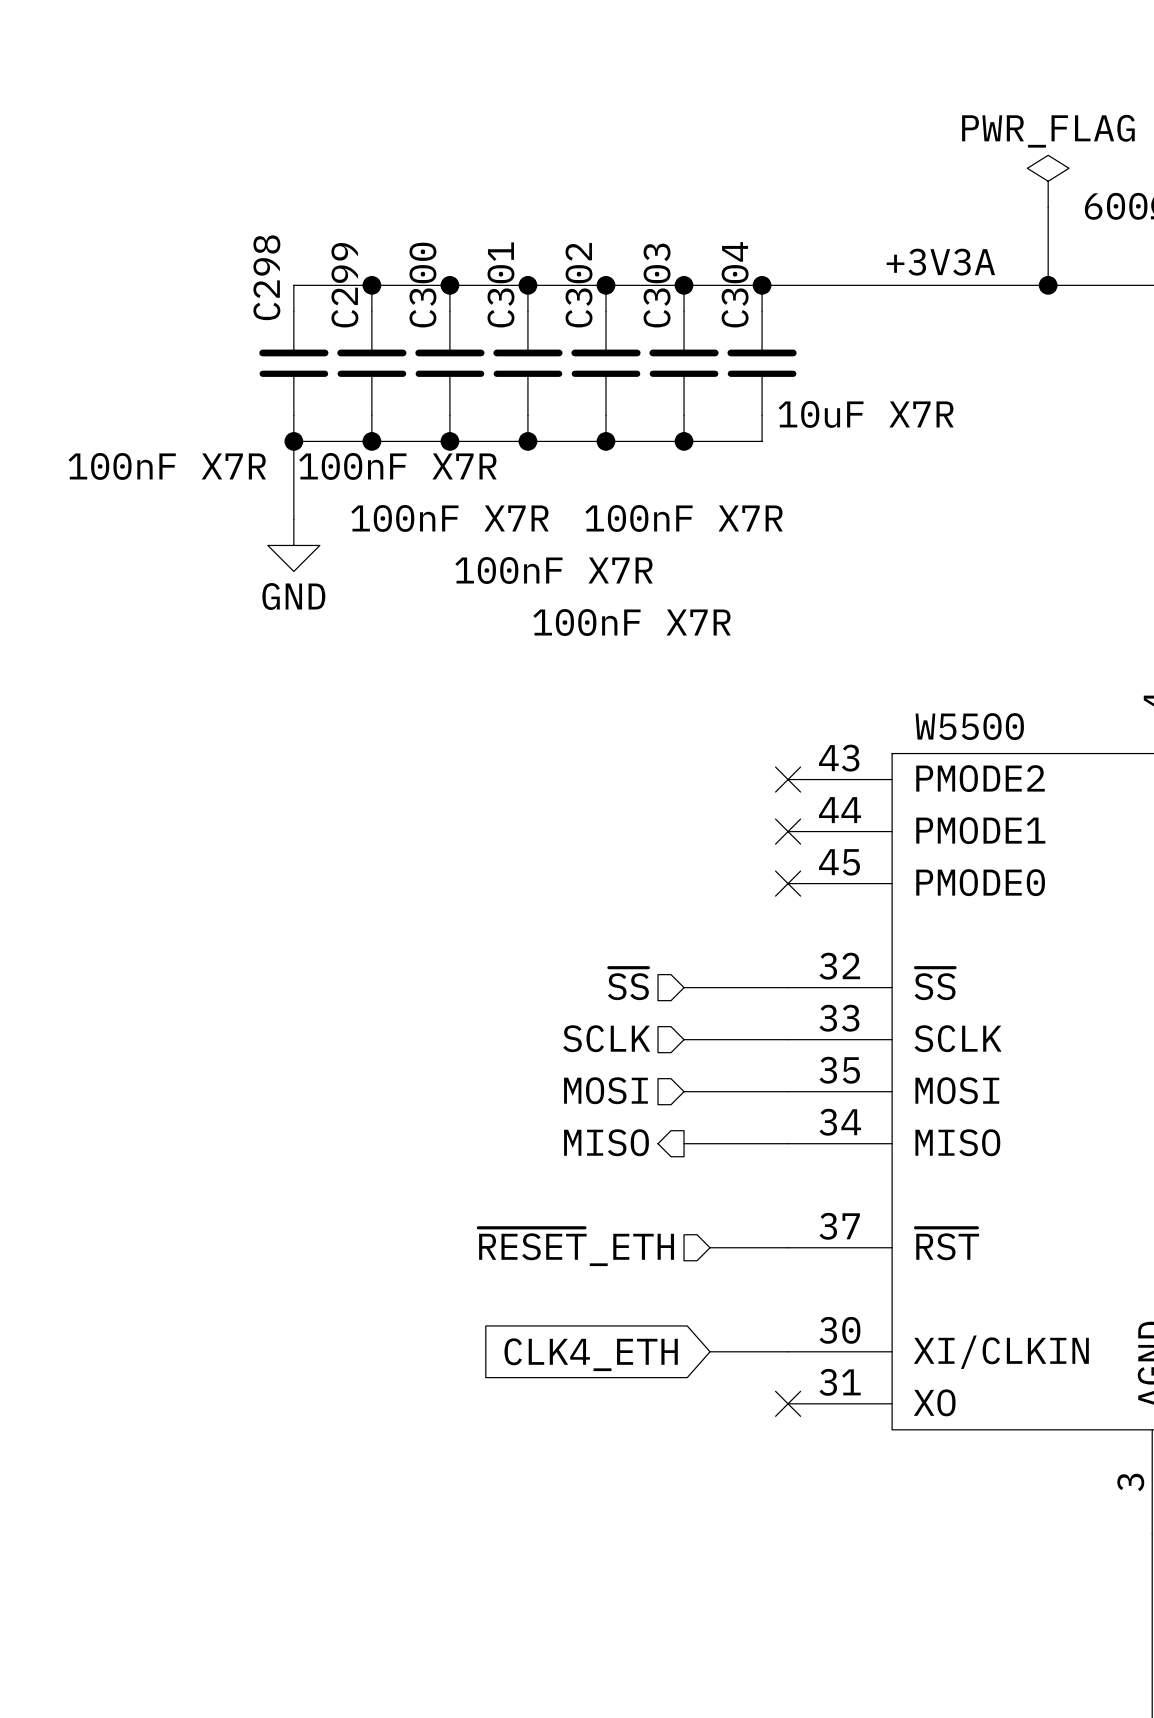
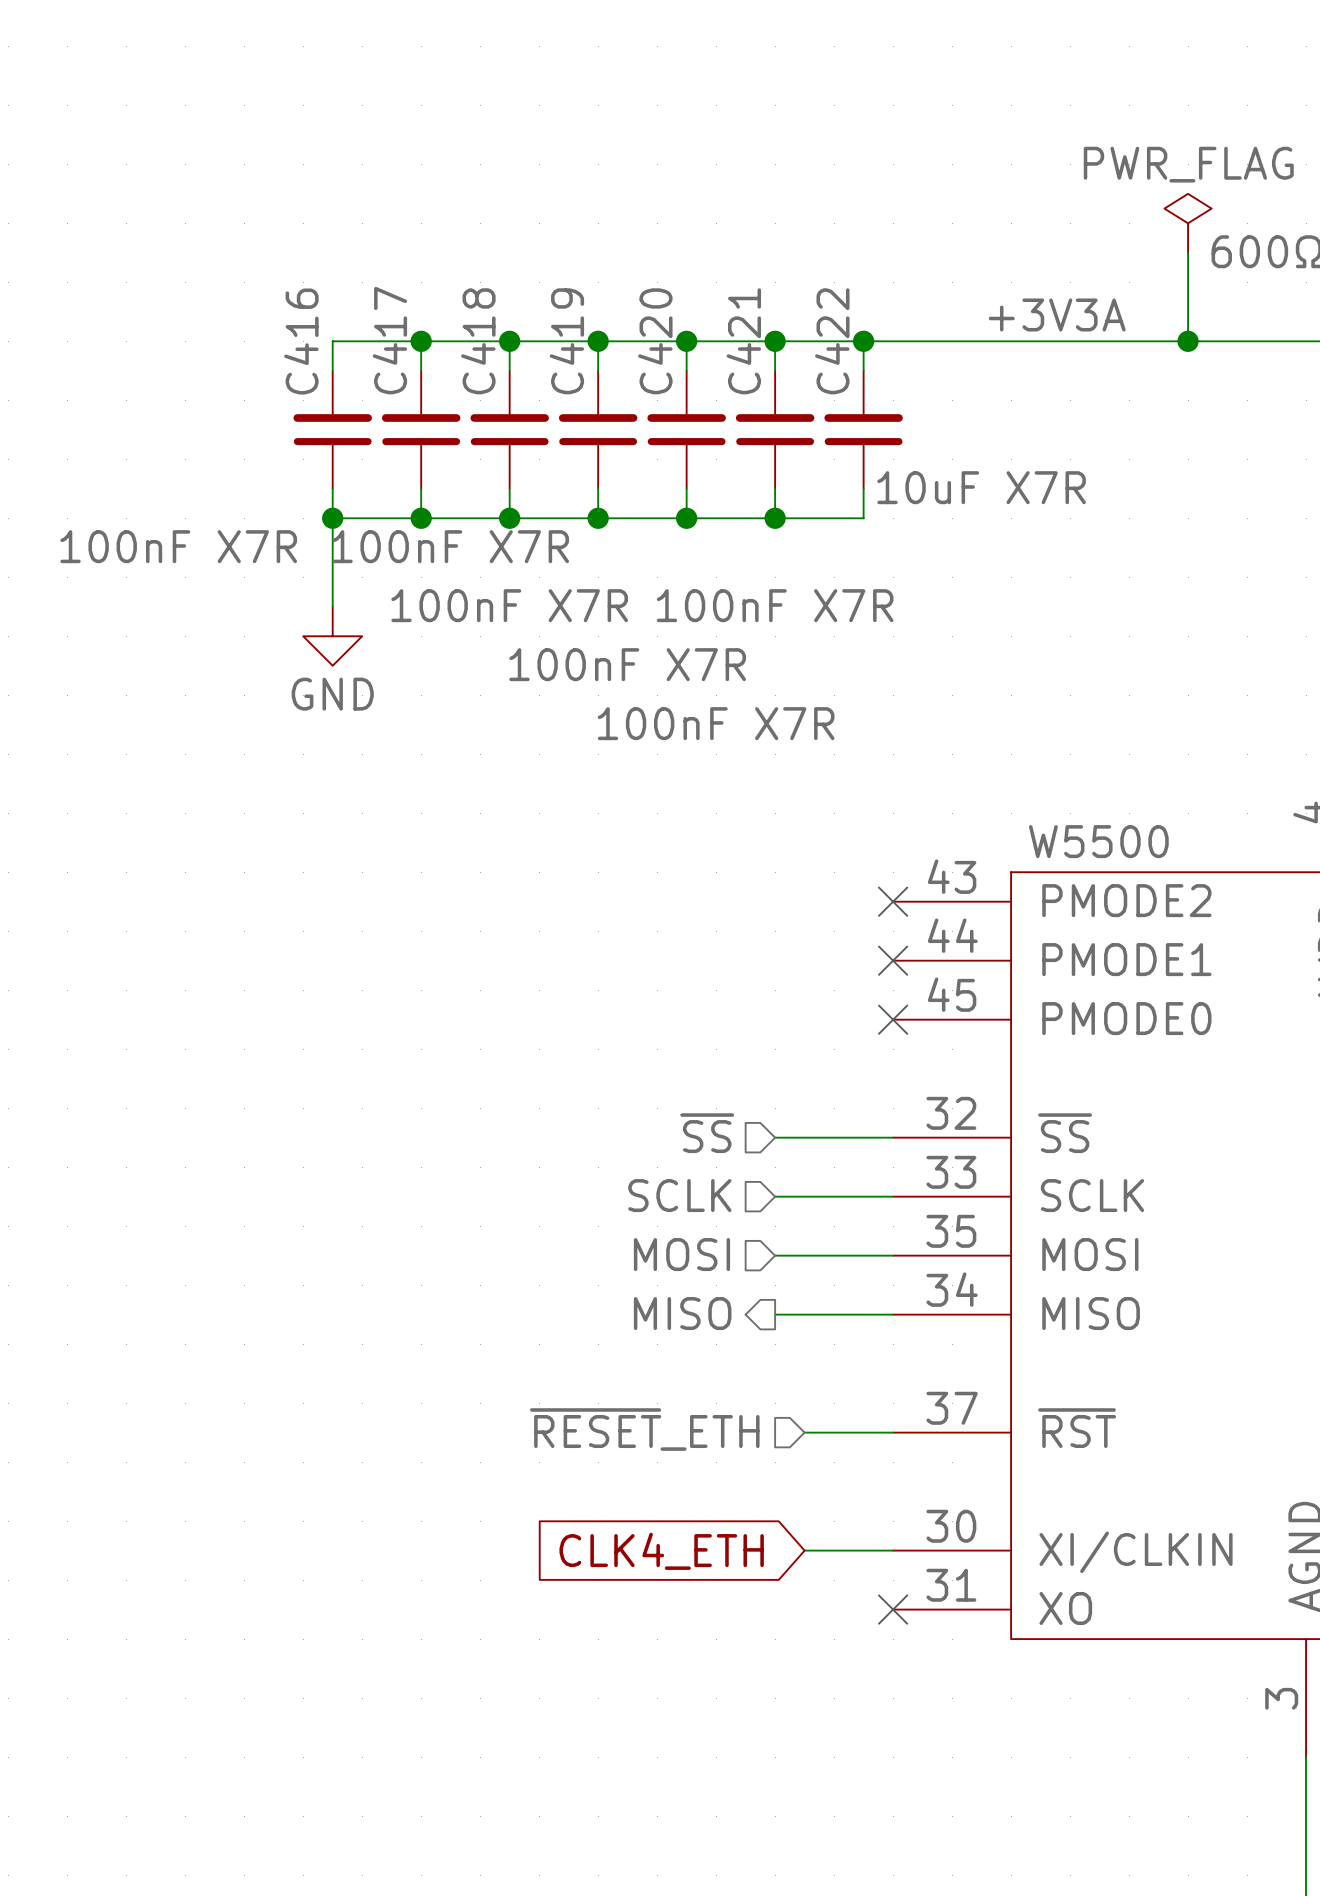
C298 name: C298 (266, 277) -> C416 (301, 341)
C301 name: C301 (500, 284) -> C419 (566, 341)
C304 name: C304 (735, 284) -> C422 (832, 341)
C299 name: C299 (344, 285) -> C417 (389, 340)
C300 name: C300 (422, 285) -> C418 (478, 341)
C302 name: C302 (579, 285) -> C420 (655, 341)
C303 name: C303 (657, 285) -> C421 (743, 341)

